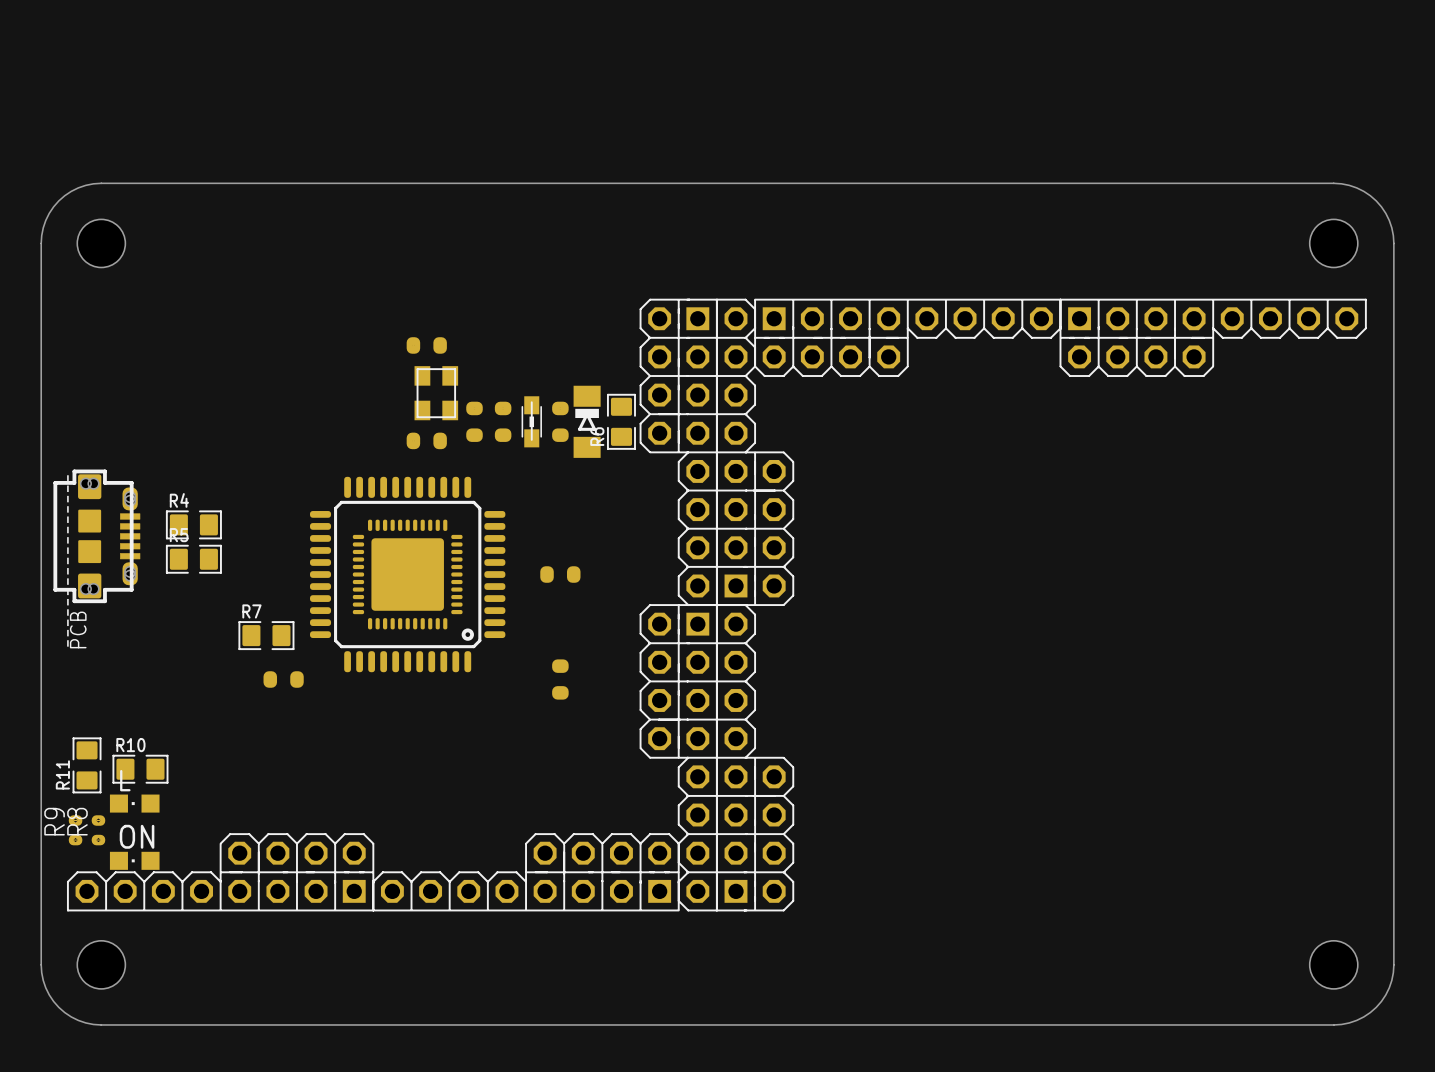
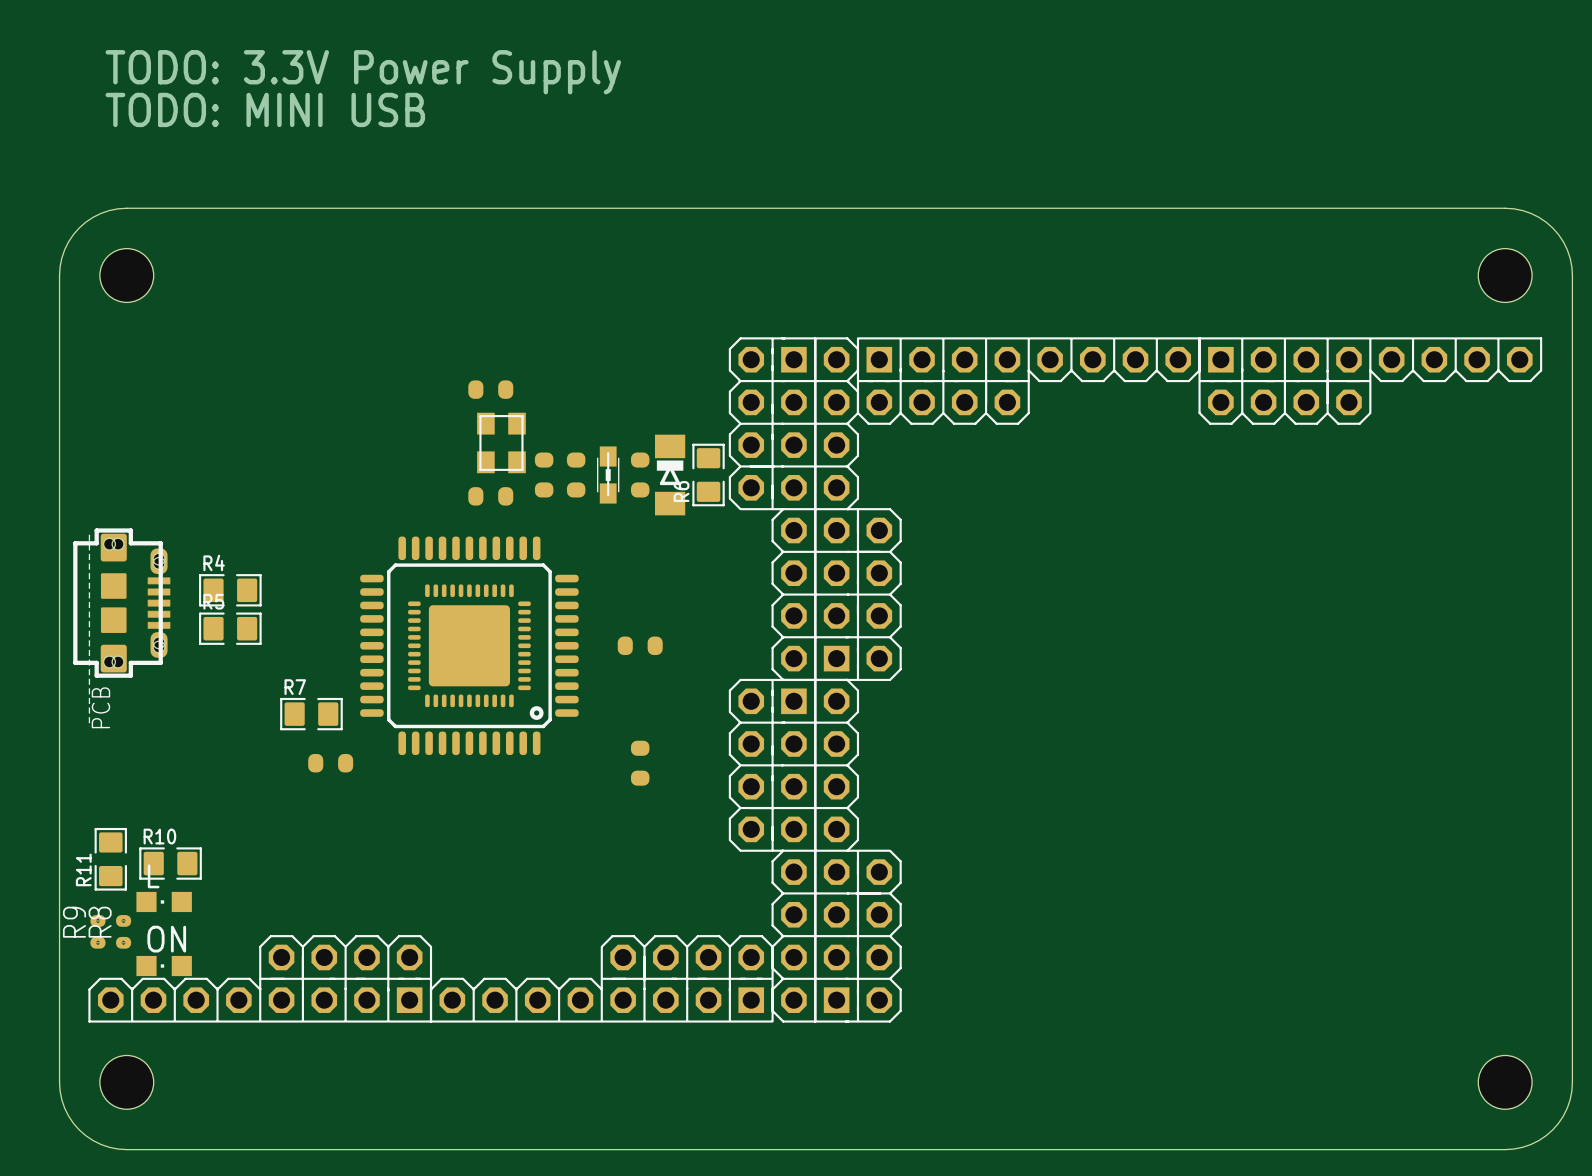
text: none -> TODO: 3.3V Power Supply (363, 72)
text: none -> TODO: MINI USB (265, 109)

